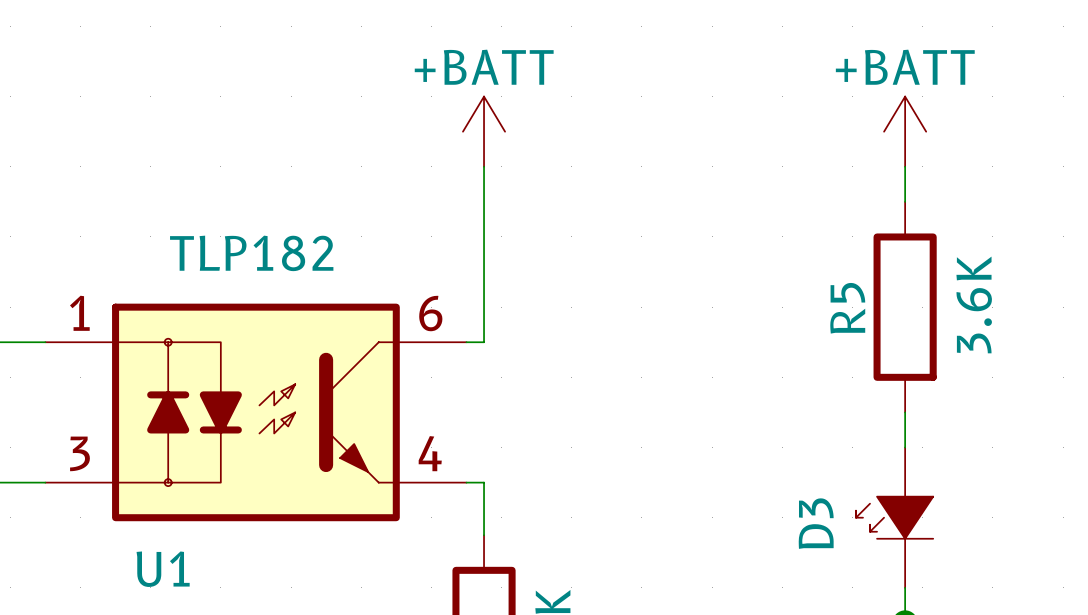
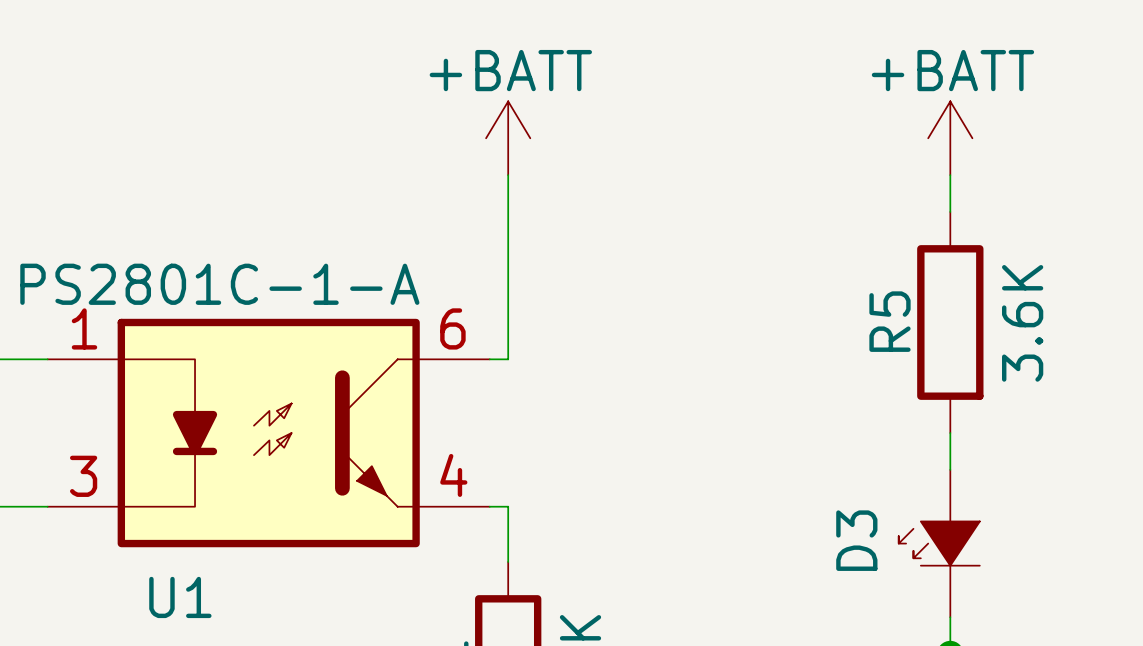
U1 value: TLP182 (251, 253) -> PS2801C-1-A (219, 284)
U1 symbol: [45, 303, 467, 522] -> [47, 318, 490, 548]

